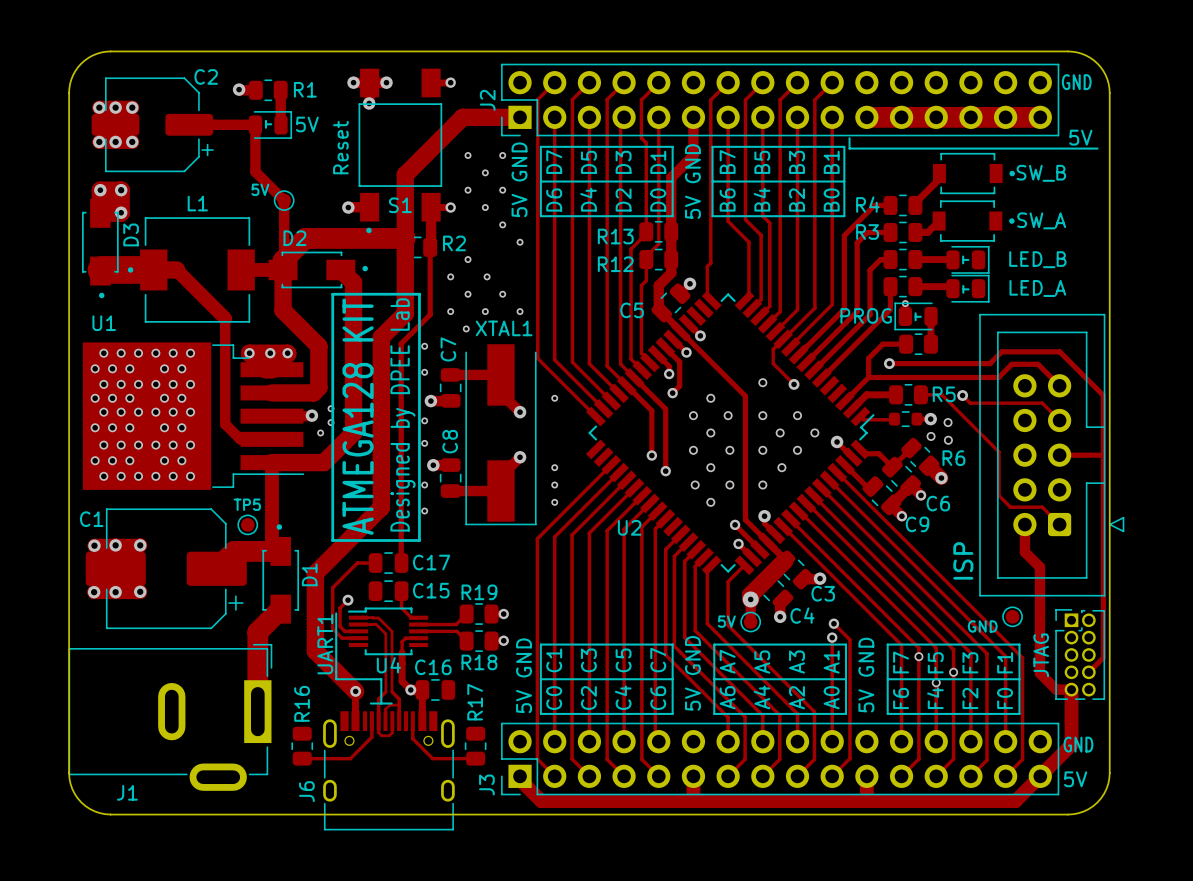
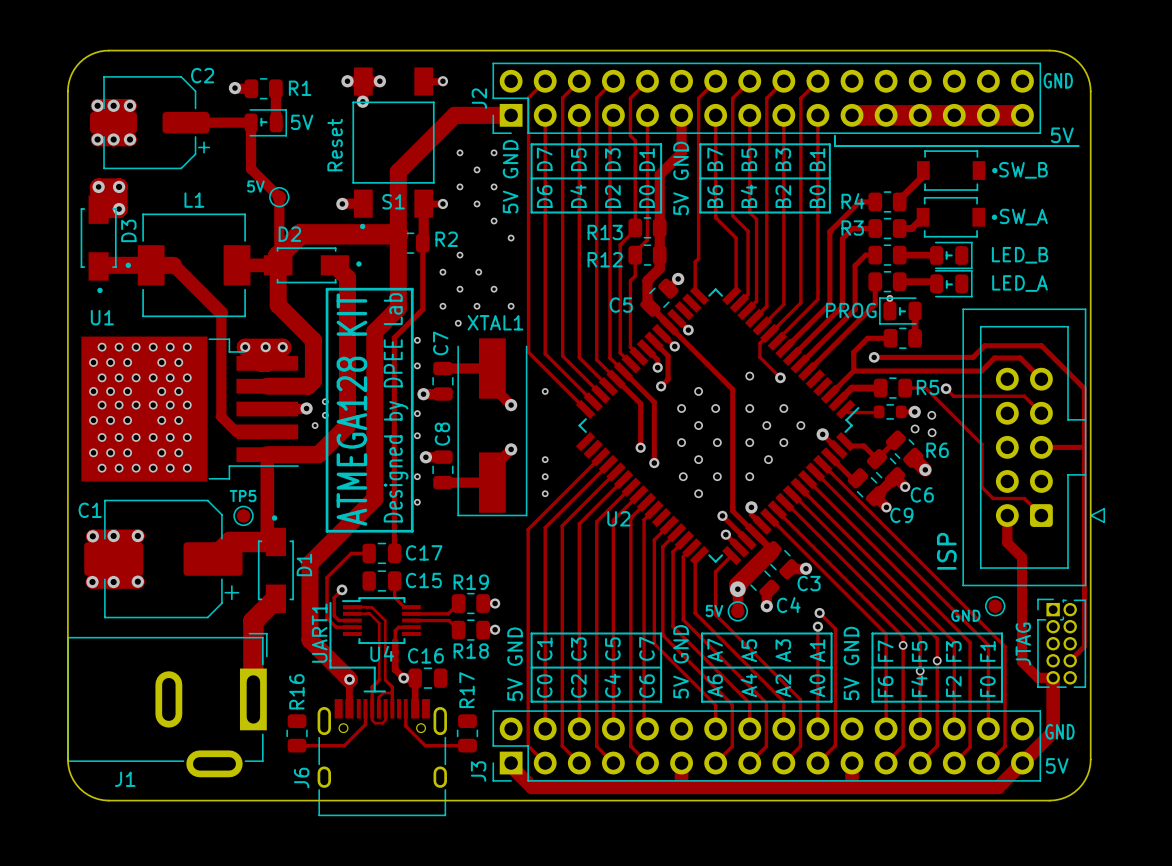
track width: thick (101, 269) (153, 269) -> thin (99, 265) (151, 265)

